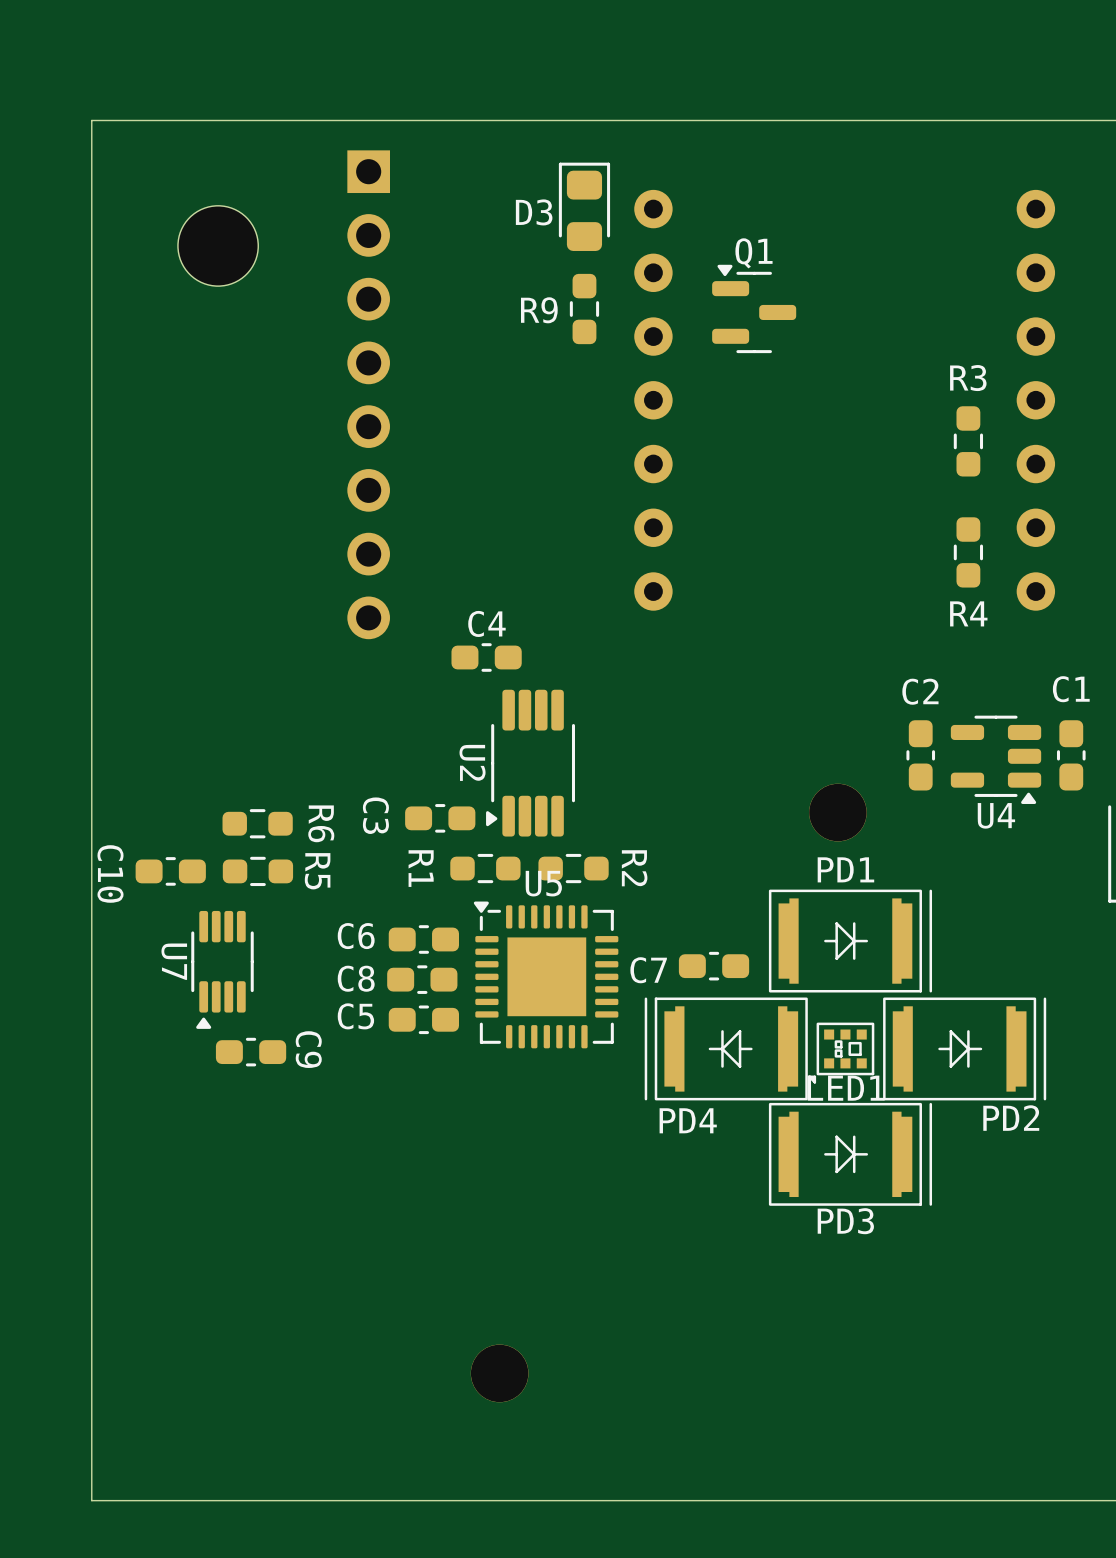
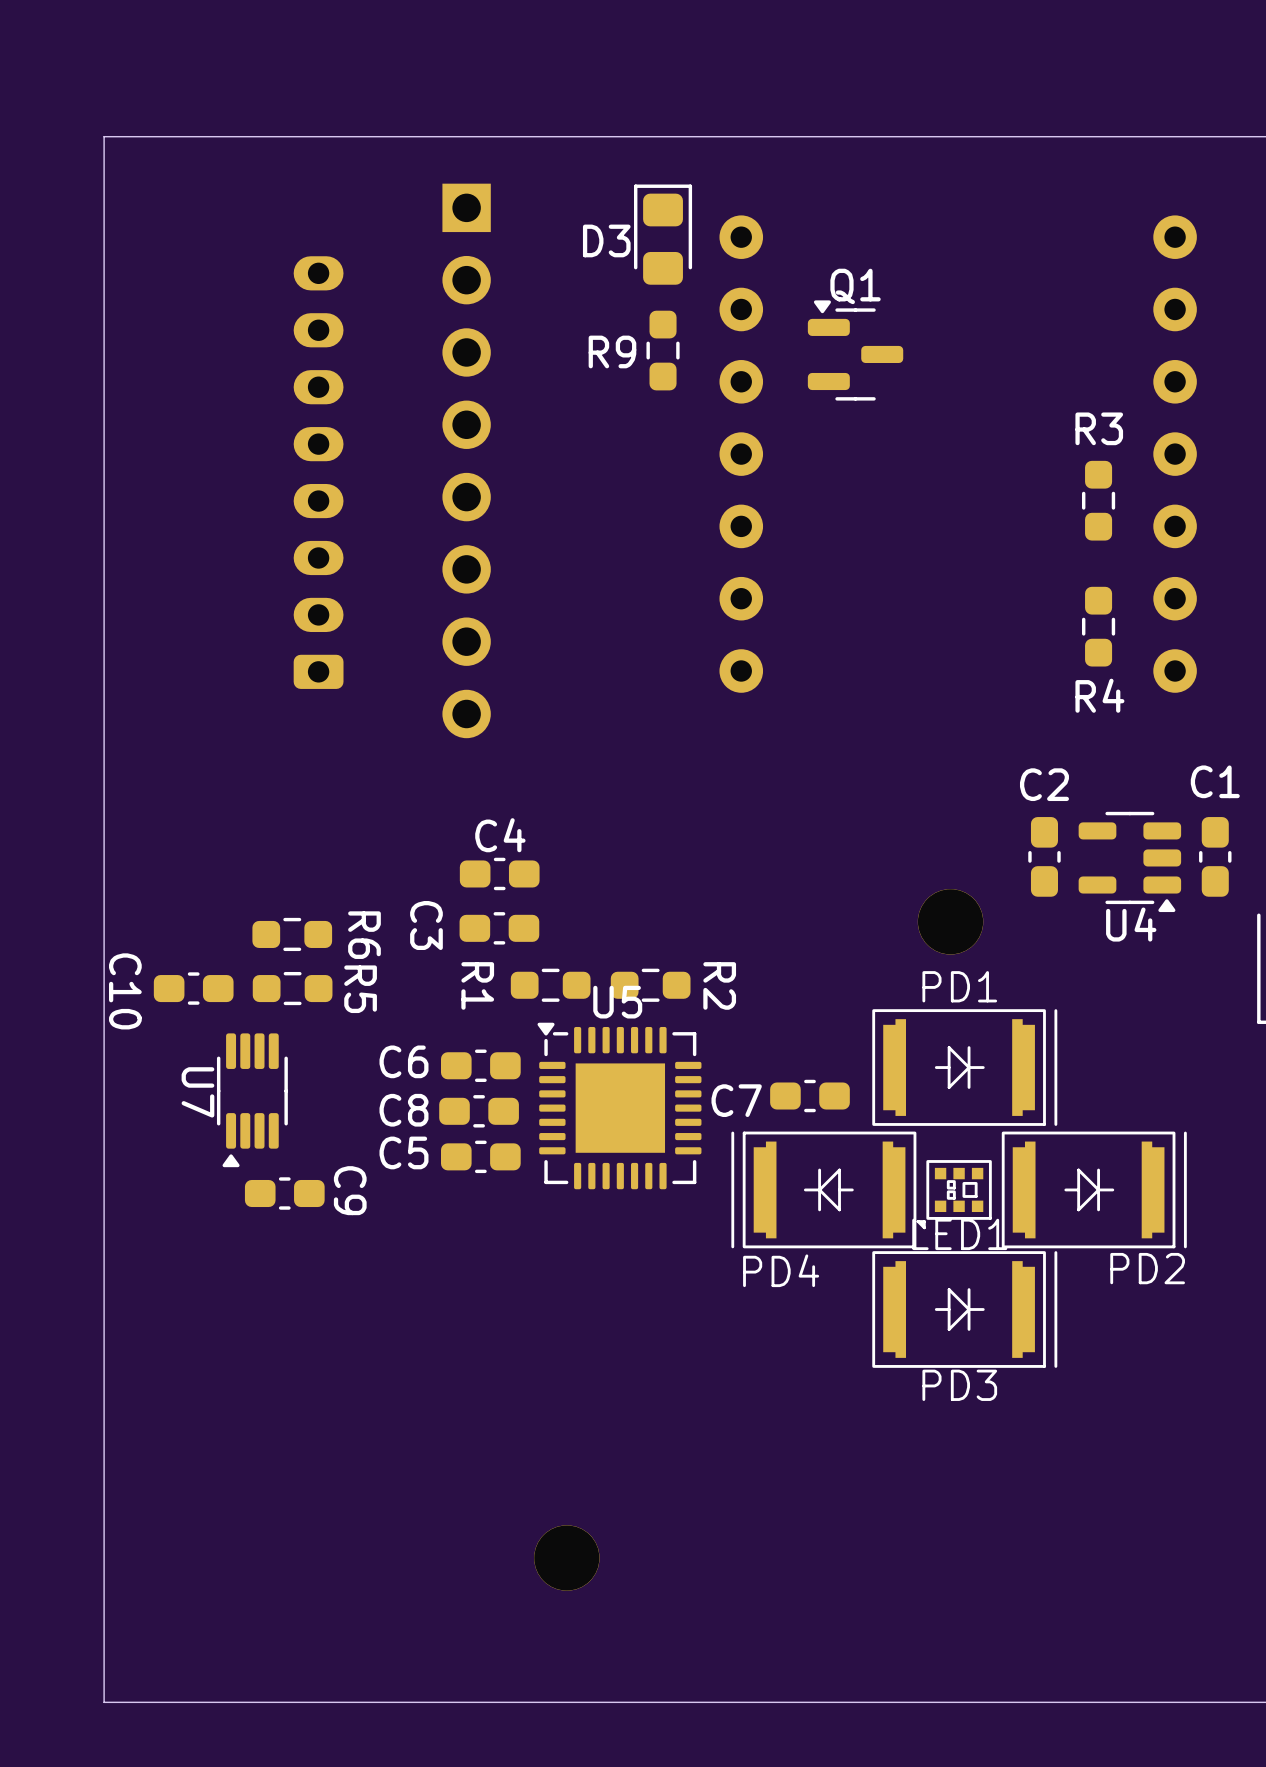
part: (218, 245) -> none
part position: (368, 394) -> (466, 460)
part: none -> (318, 472)
C4 position: (486, 657) -> (499, 873)
U2: (530, 763) -> none

